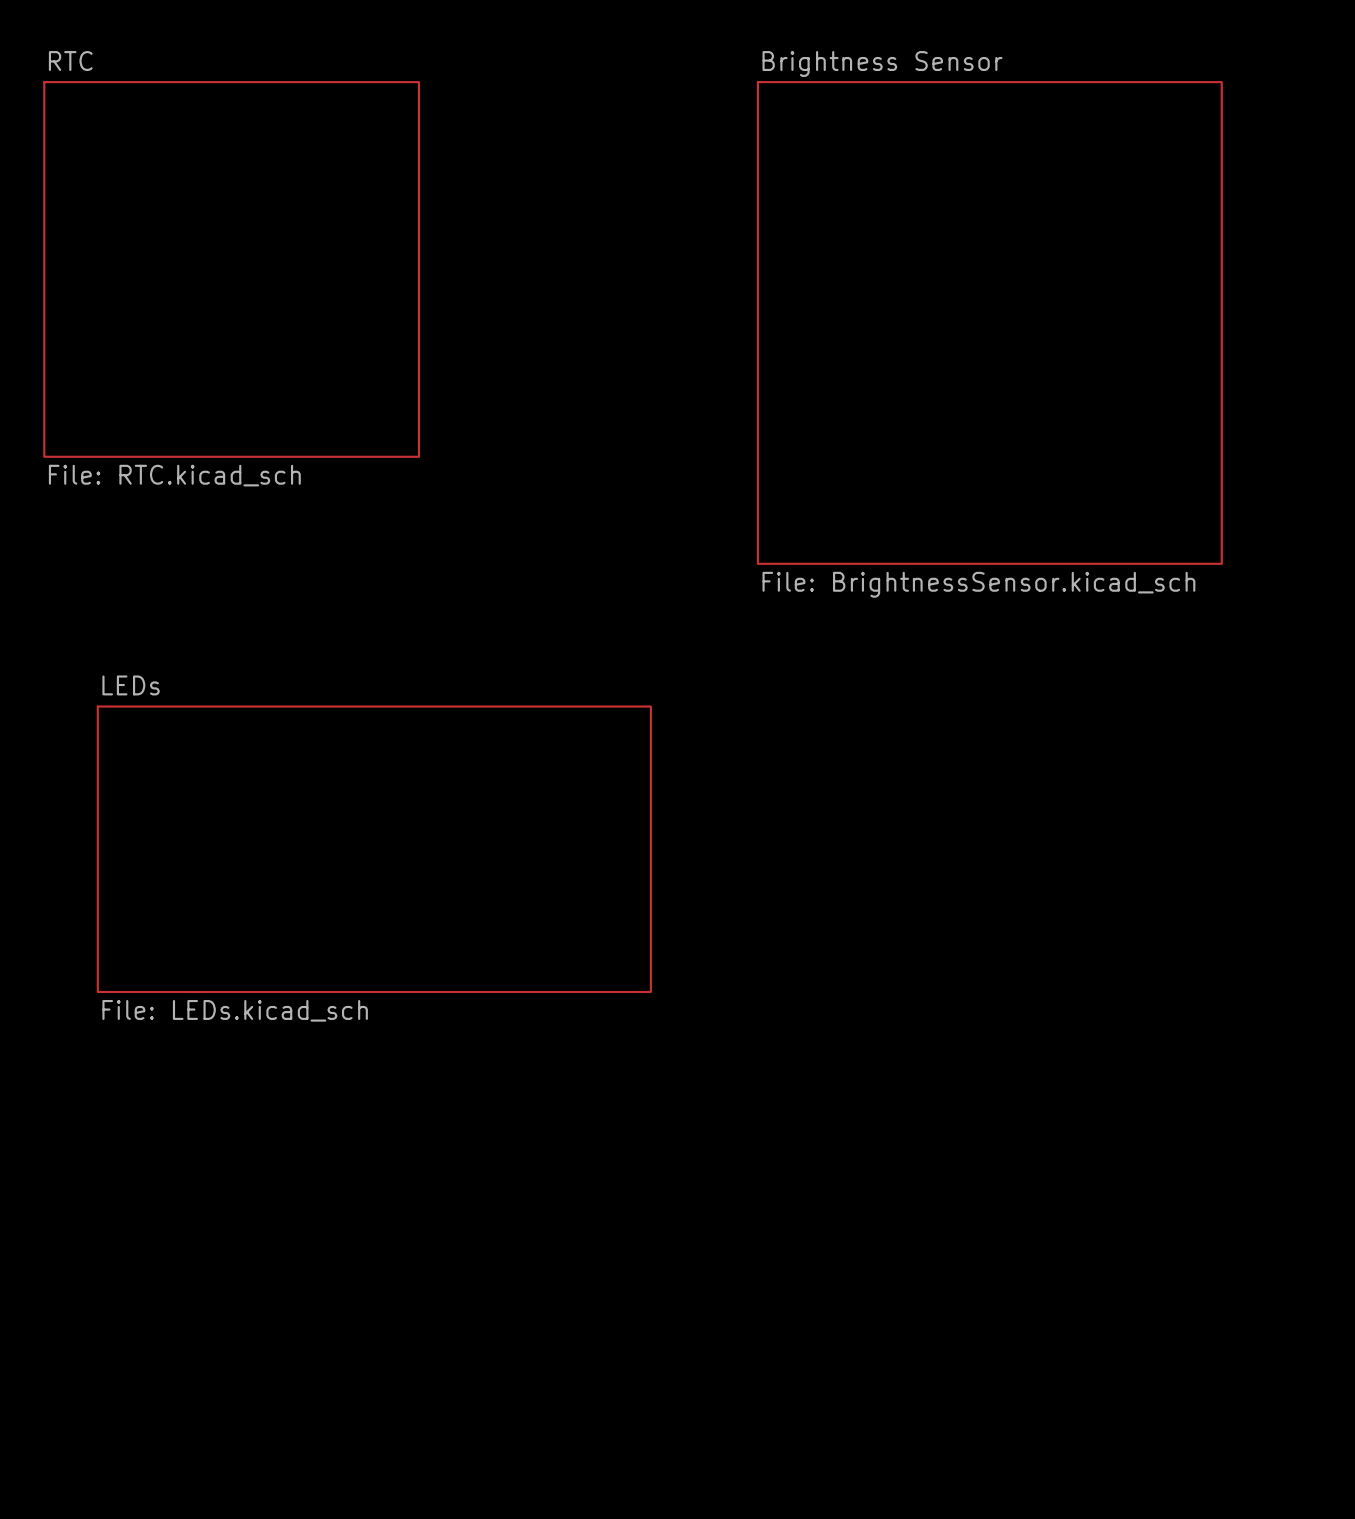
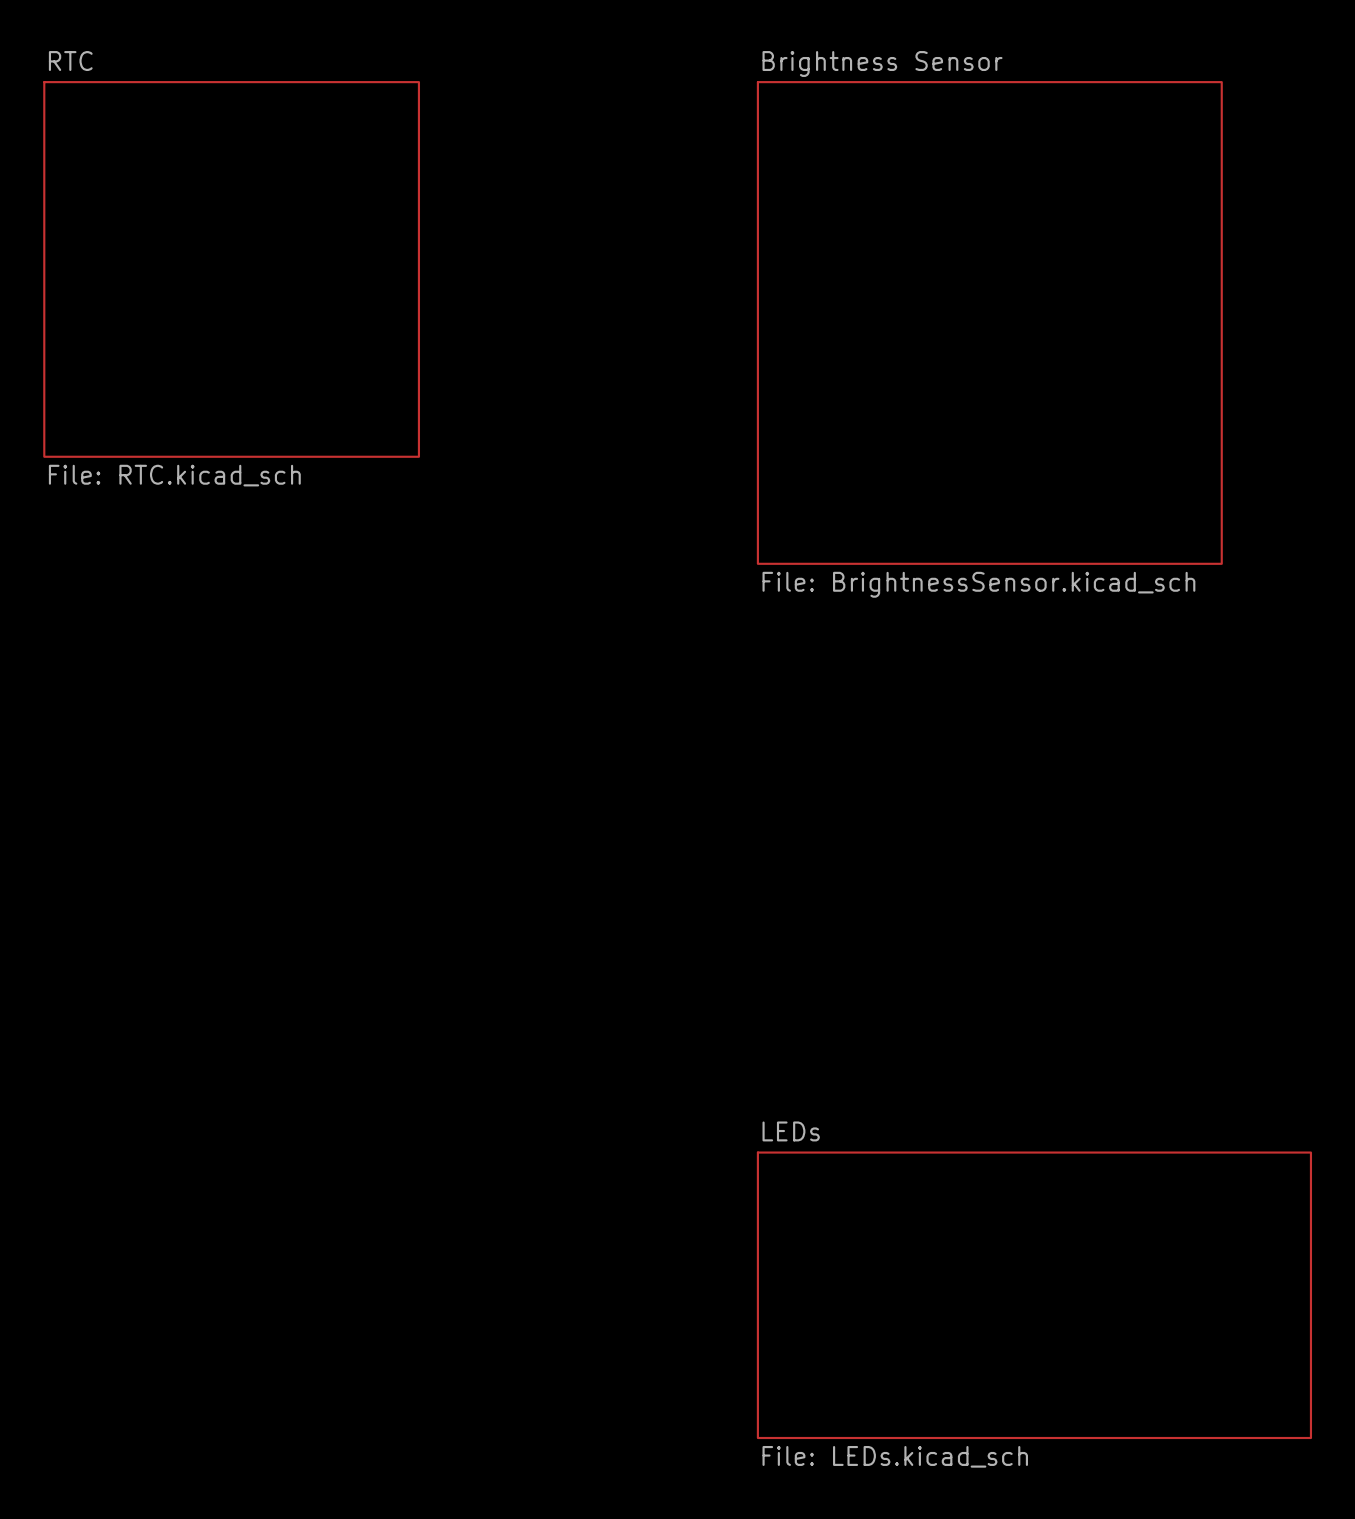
sheet LEDs: File: LEDs.kicad_sch (374, 849) -> none
sheet LEDs: none -> File: LEDs.kicad_sch (1034, 1295)

